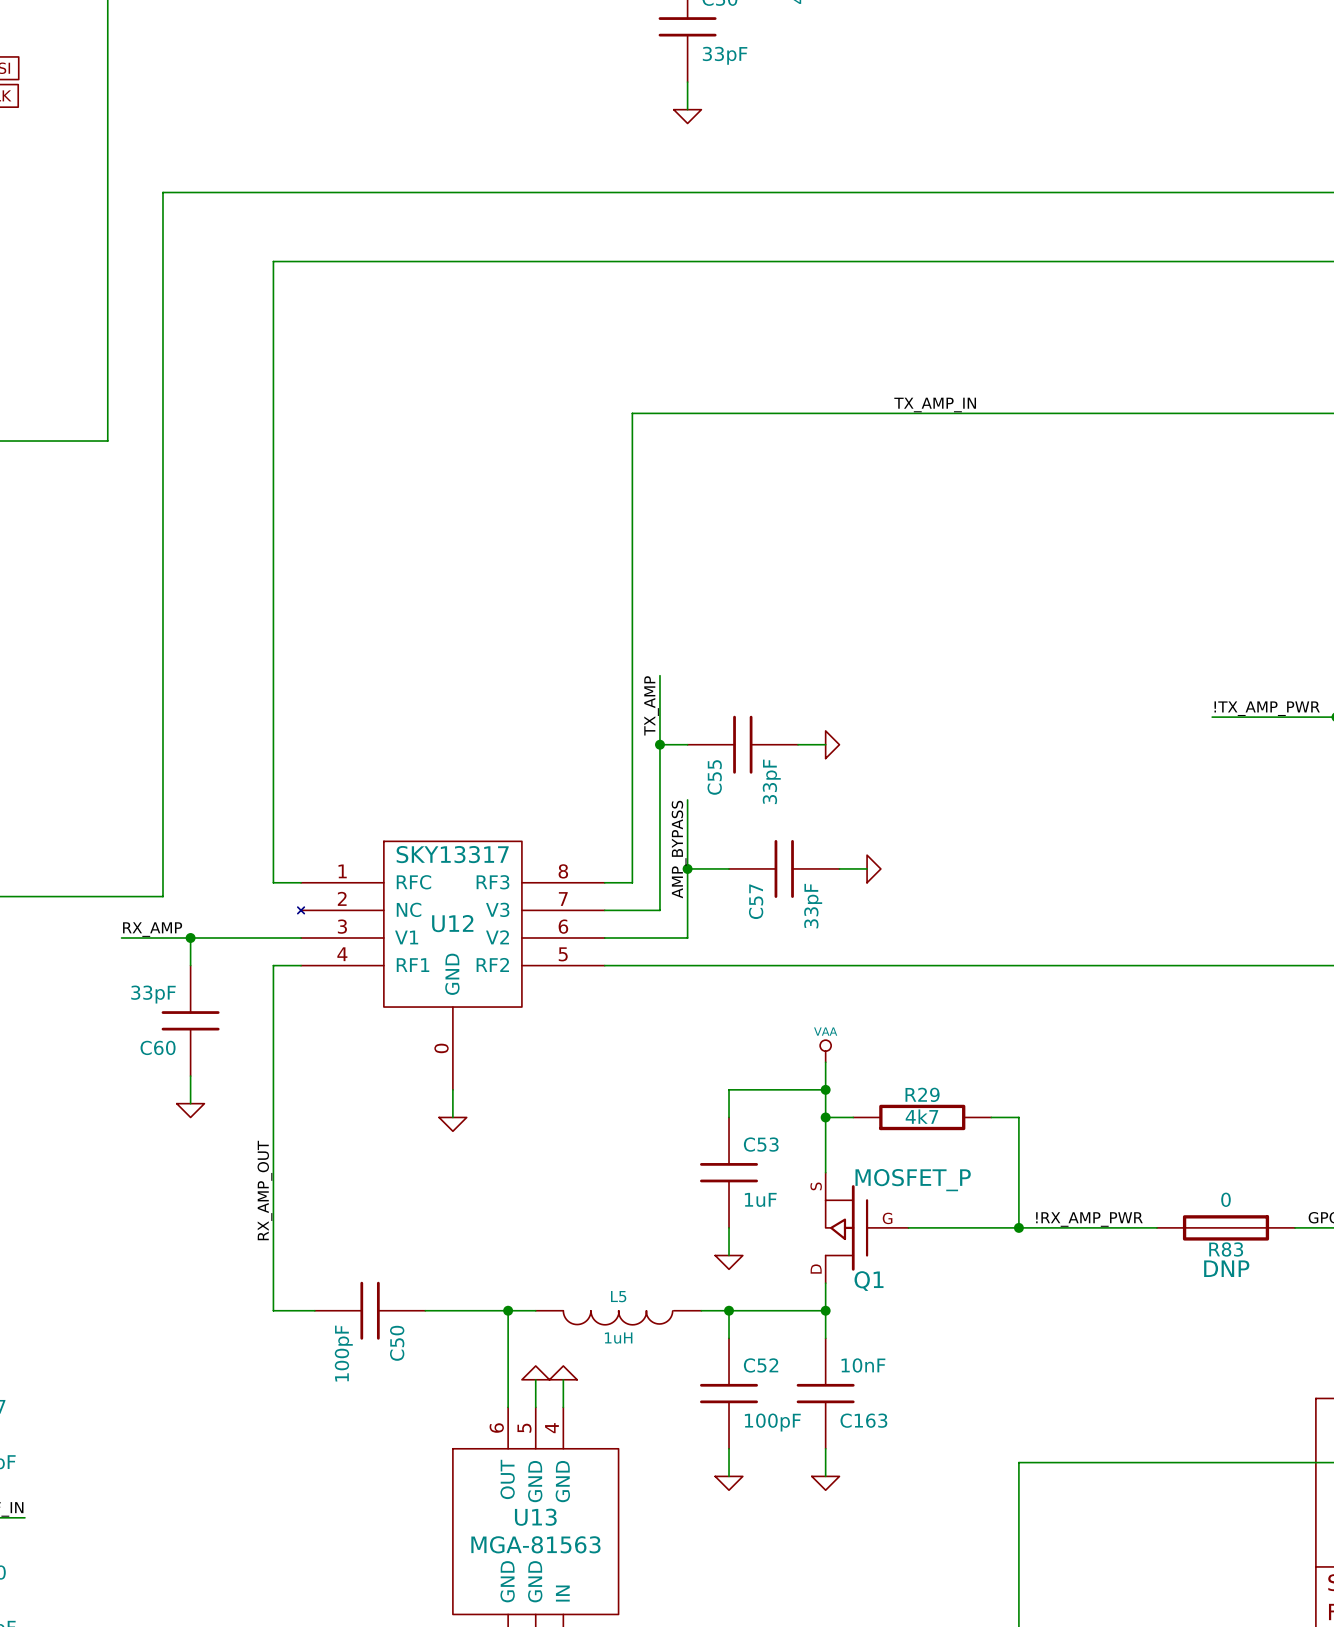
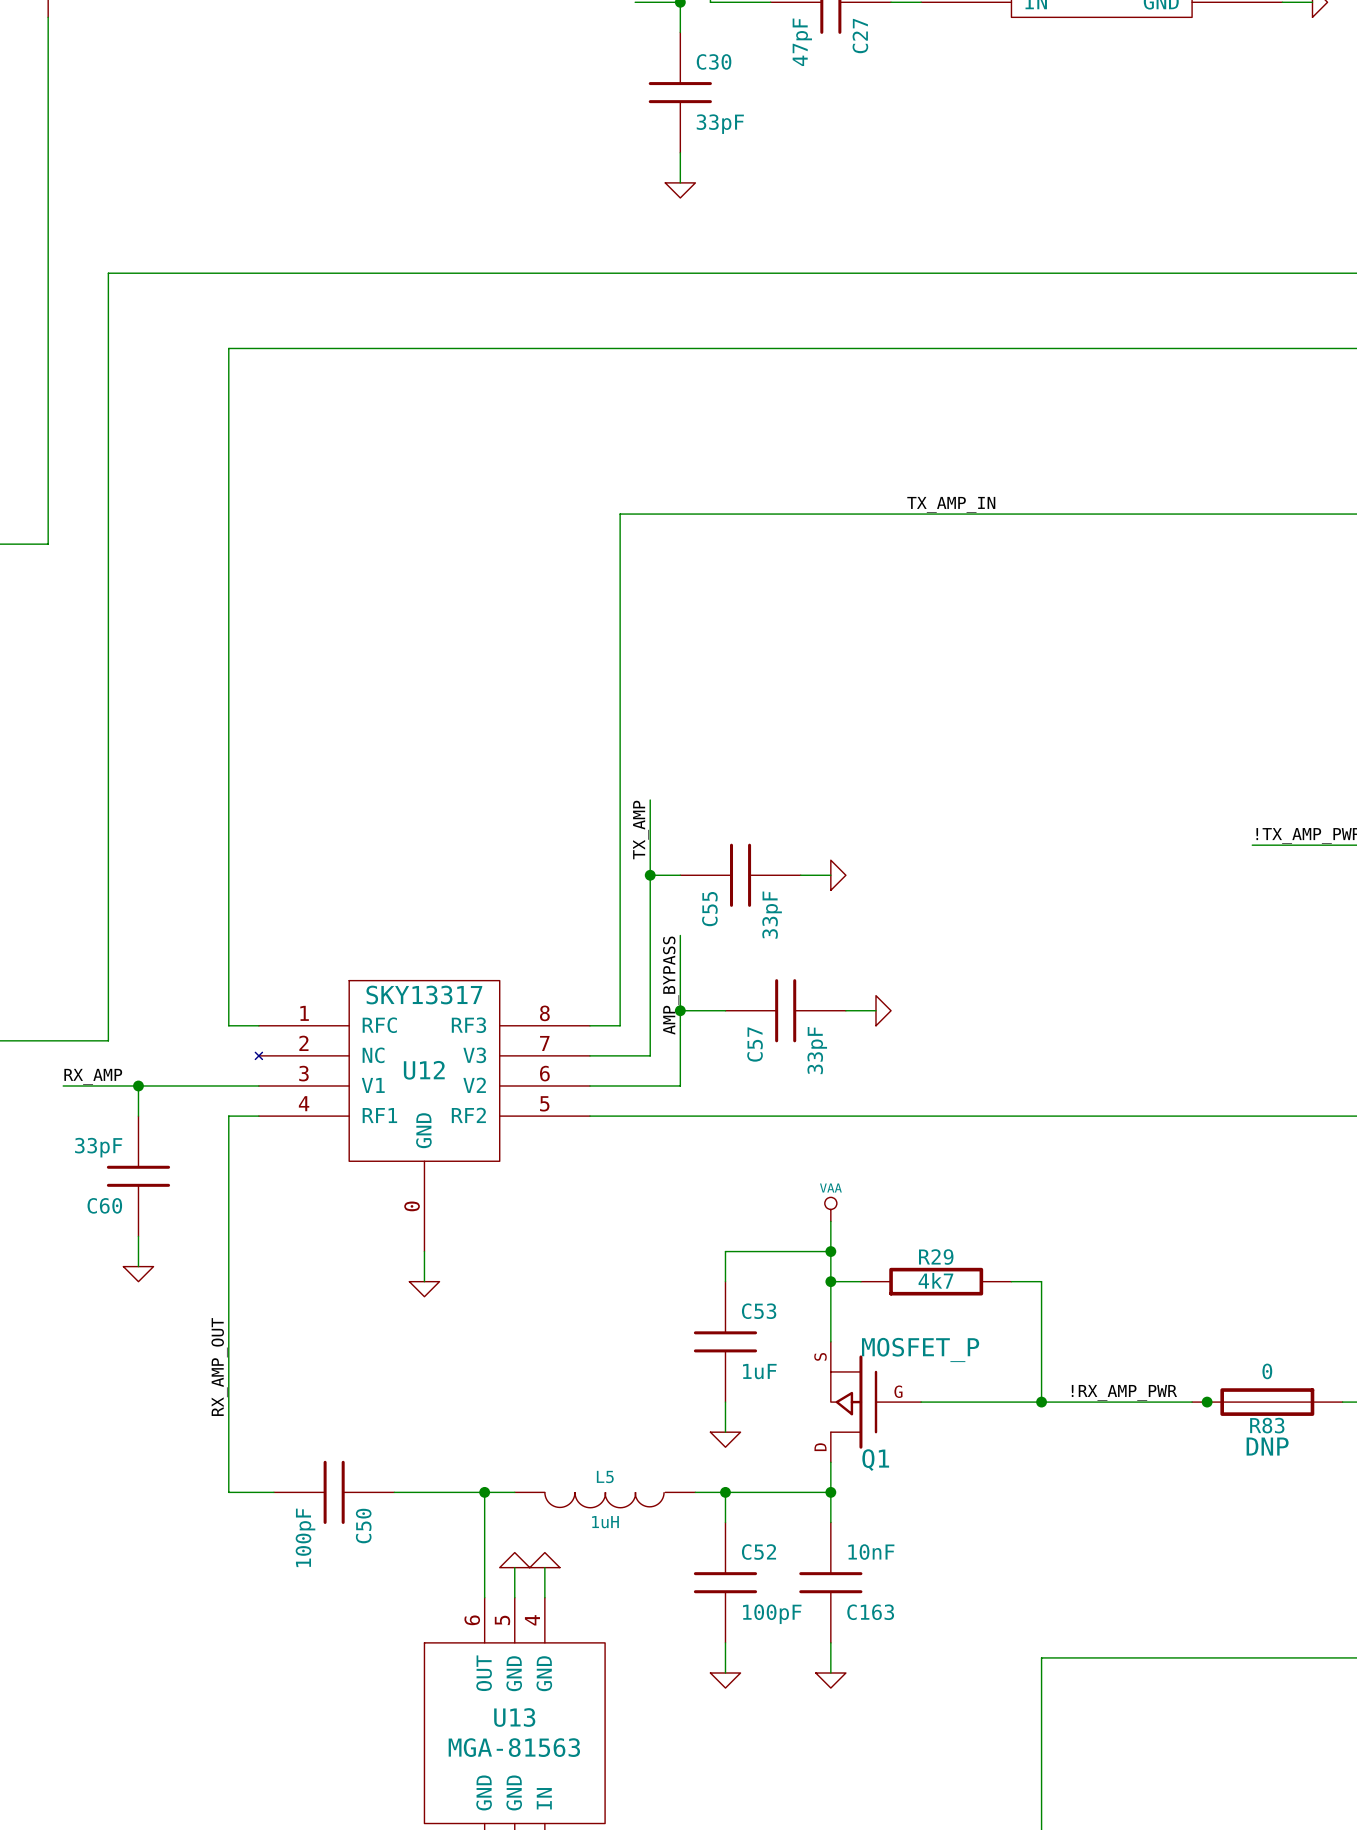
junction: none -> (1207, 1402)

